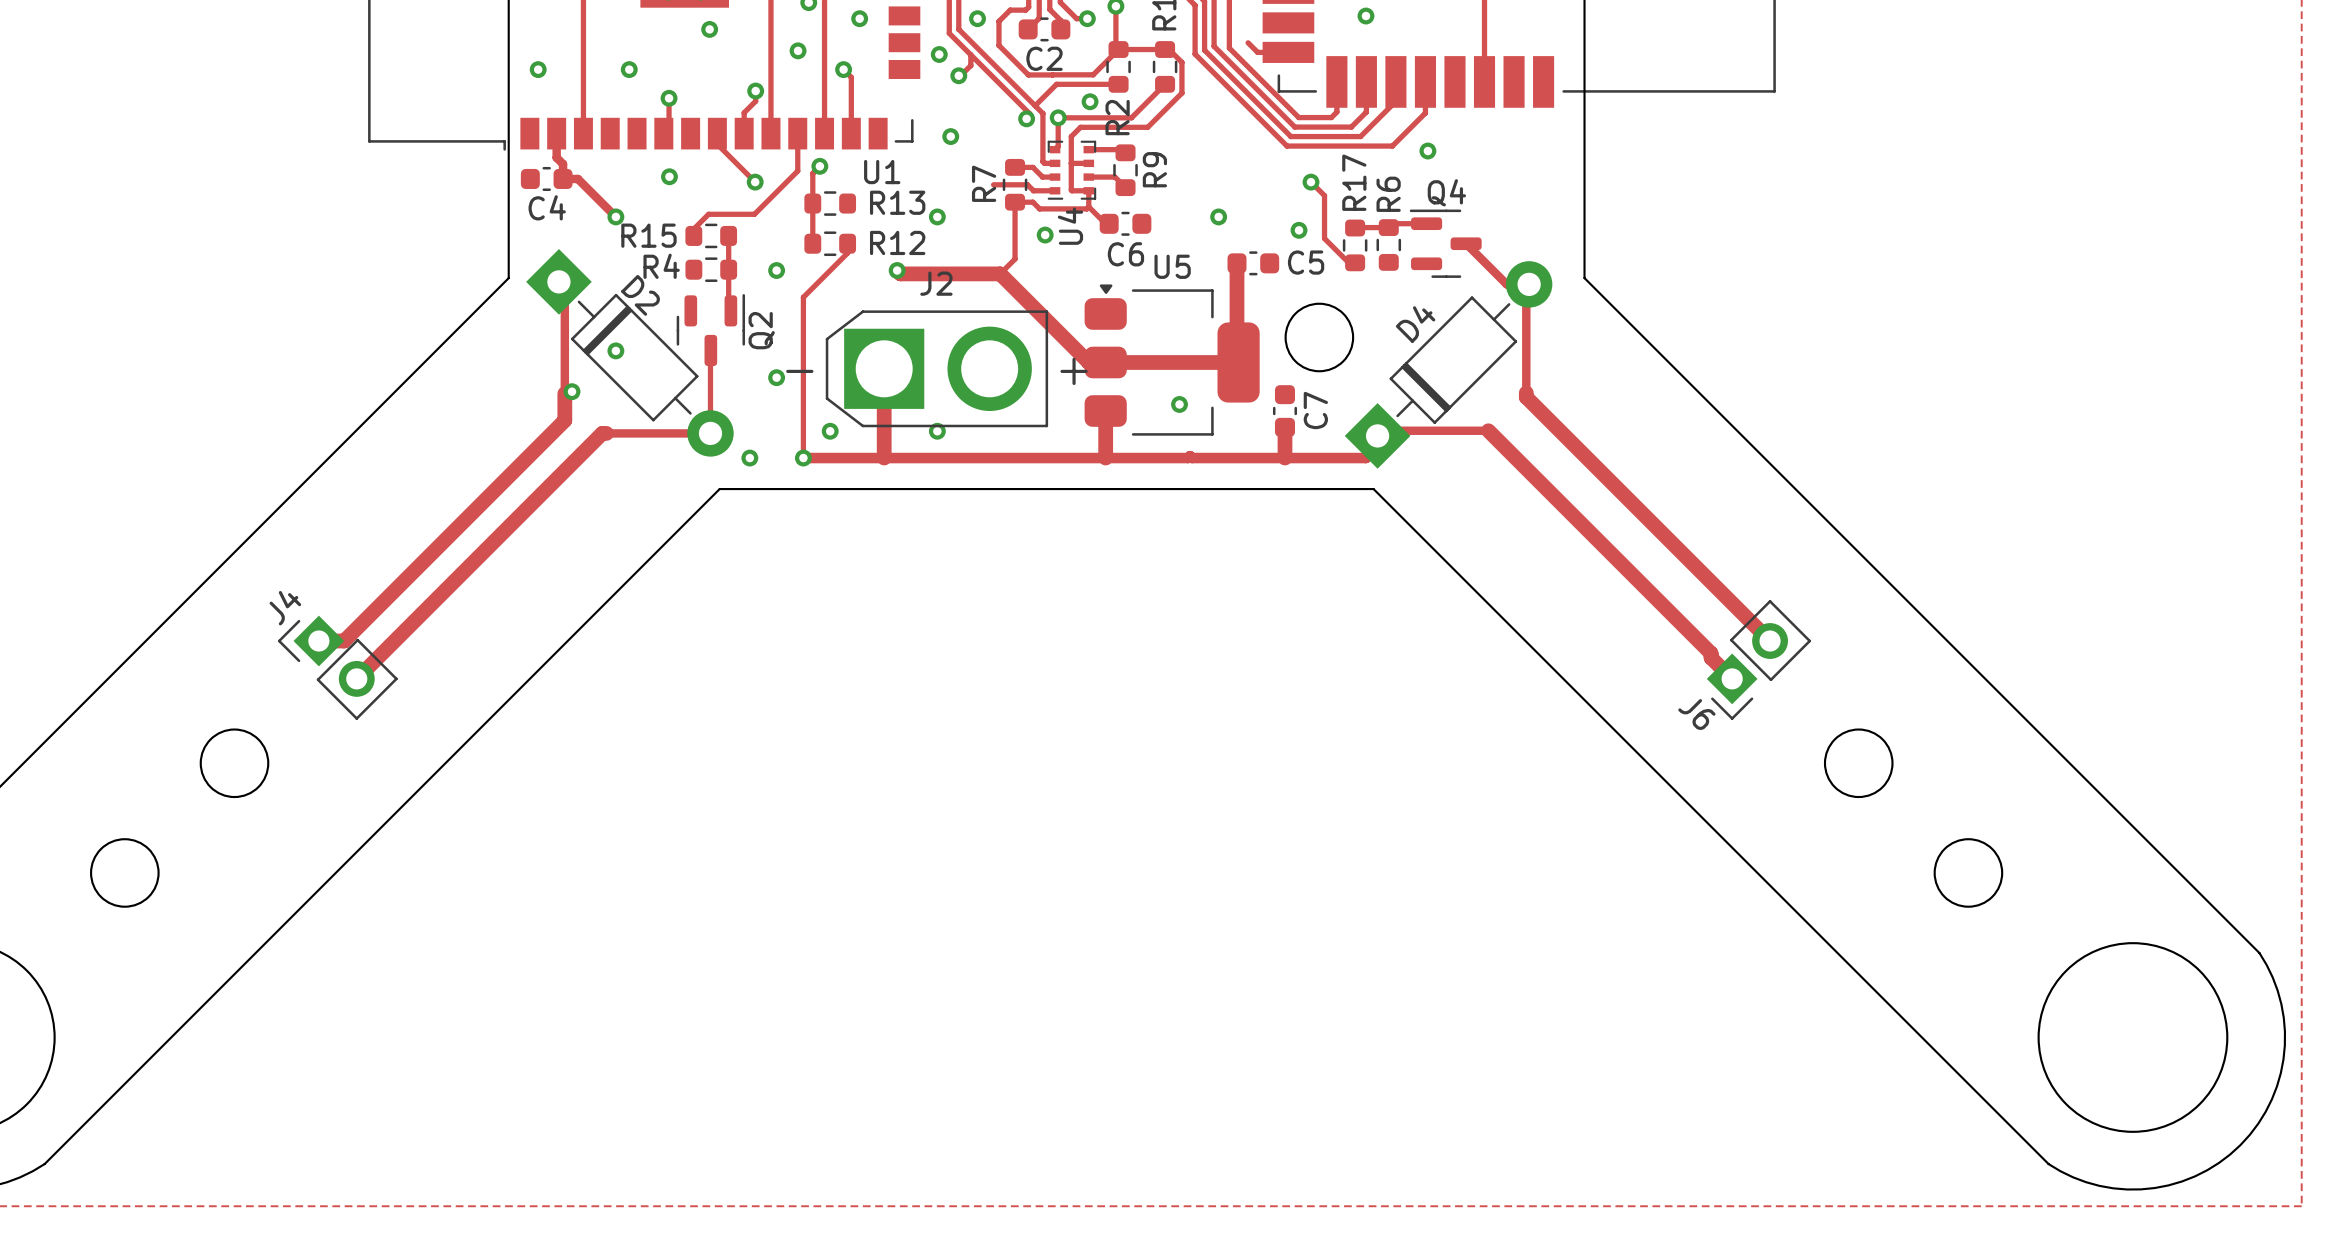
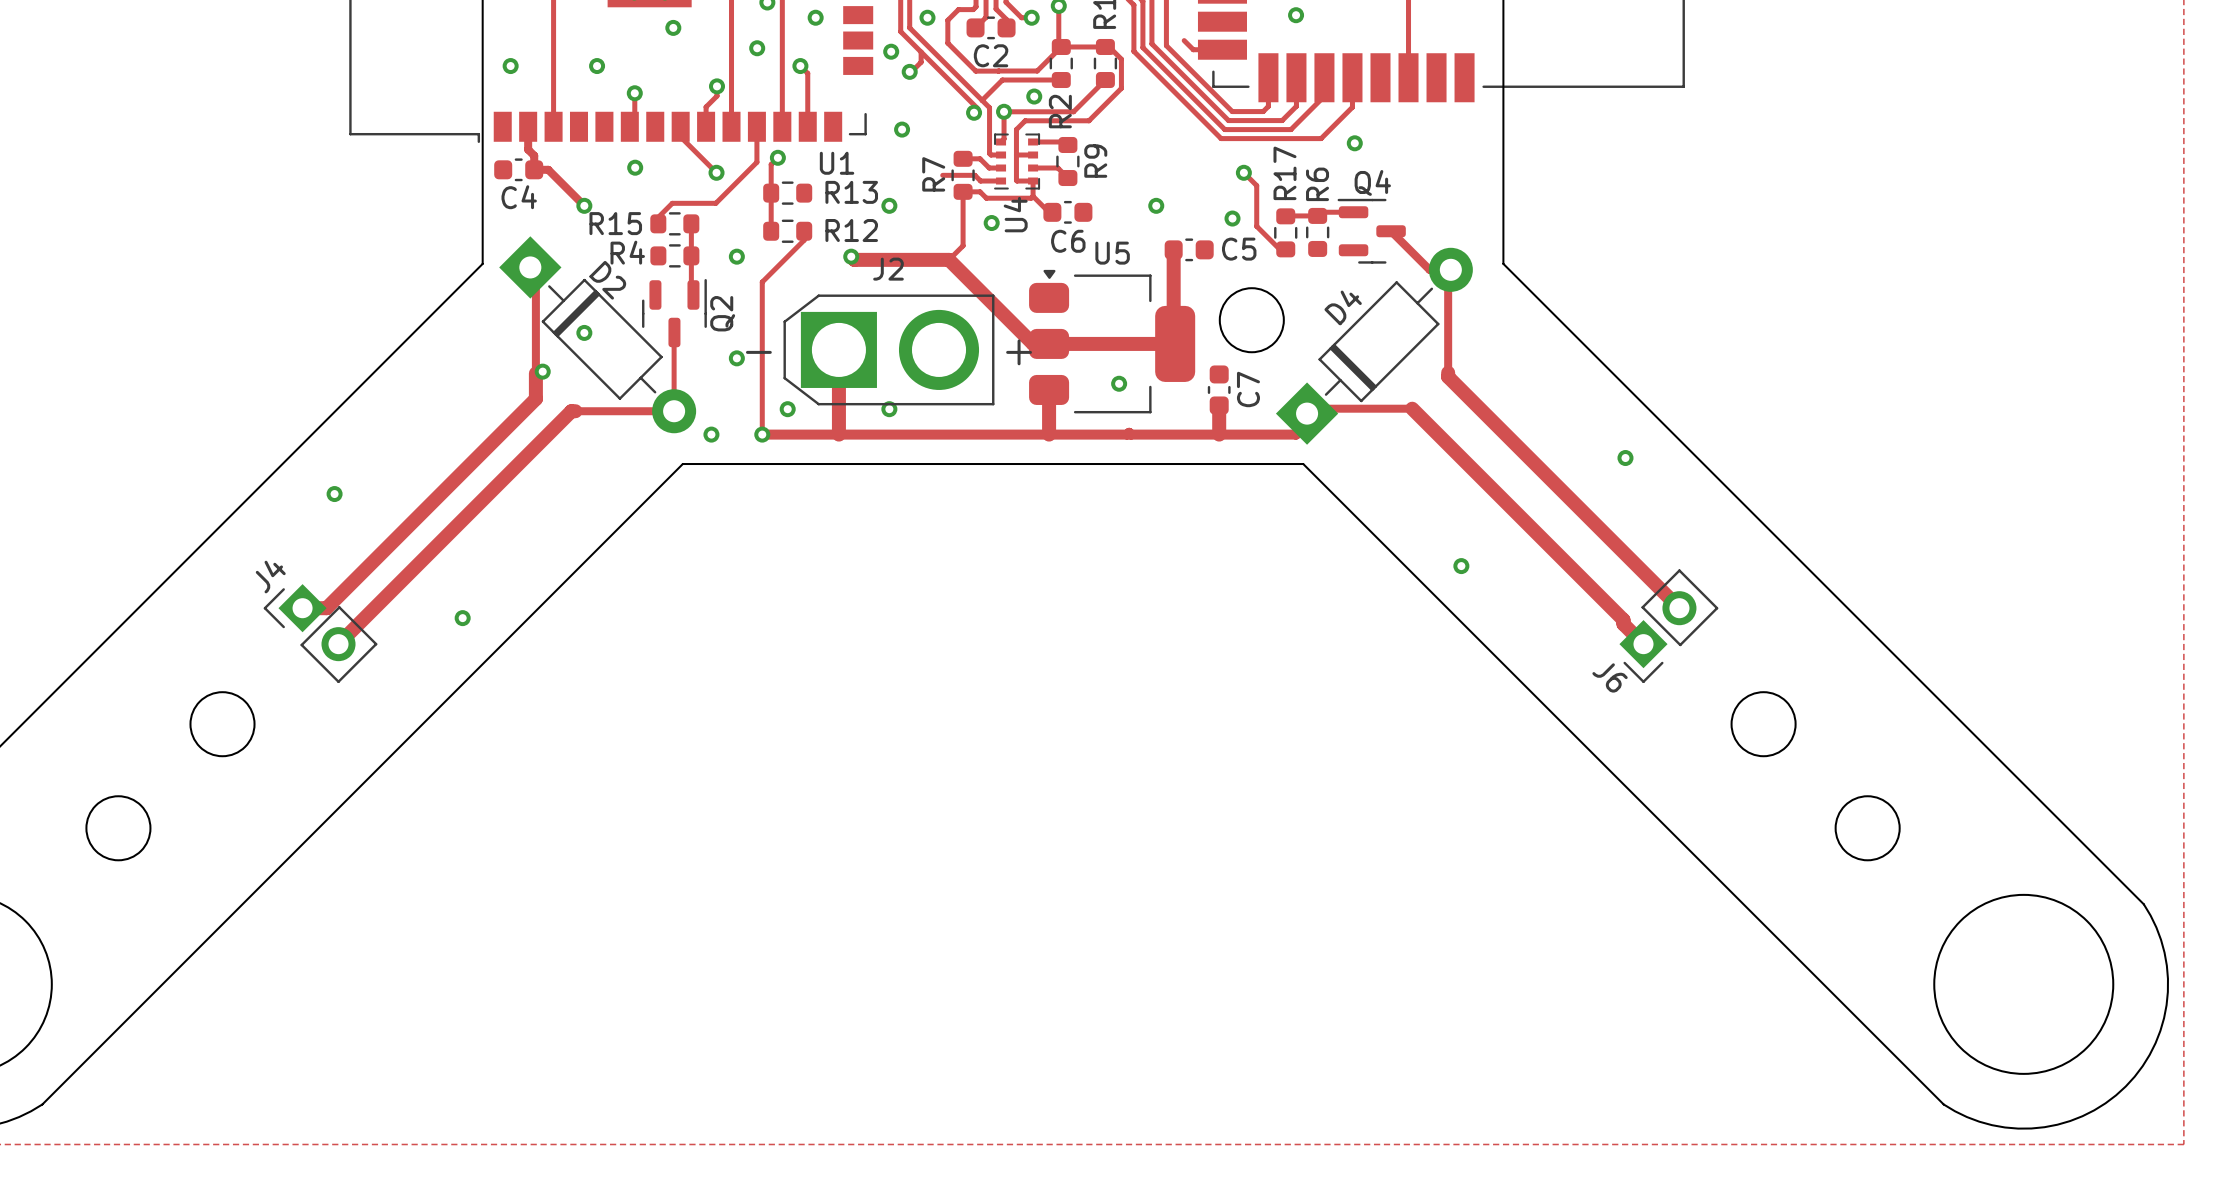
via: none -> (1625, 458)
via: none -> (334, 494)
via: none -> (1461, 566)
via: none -> (462, 618)

